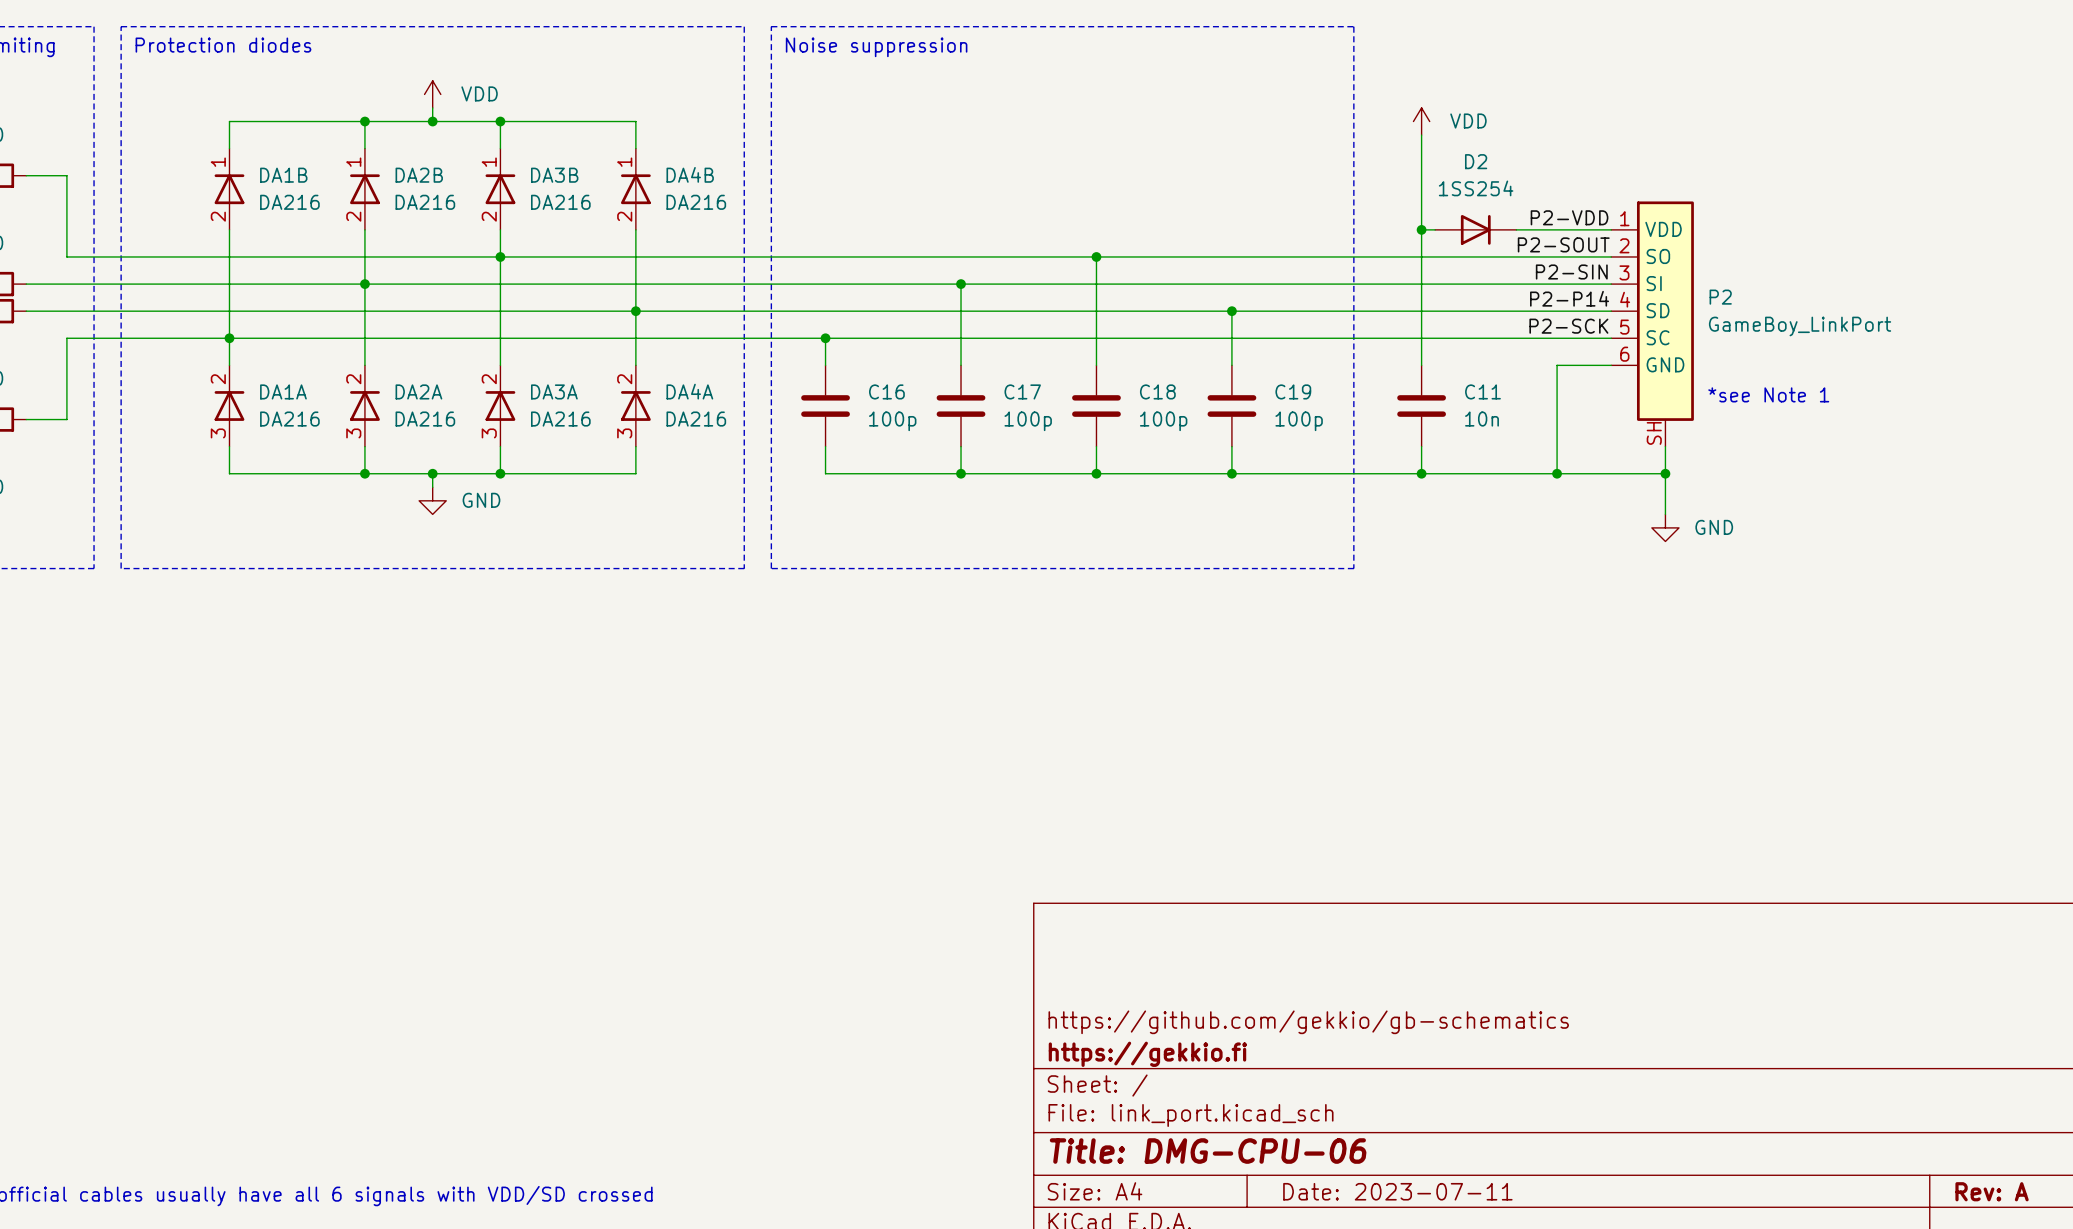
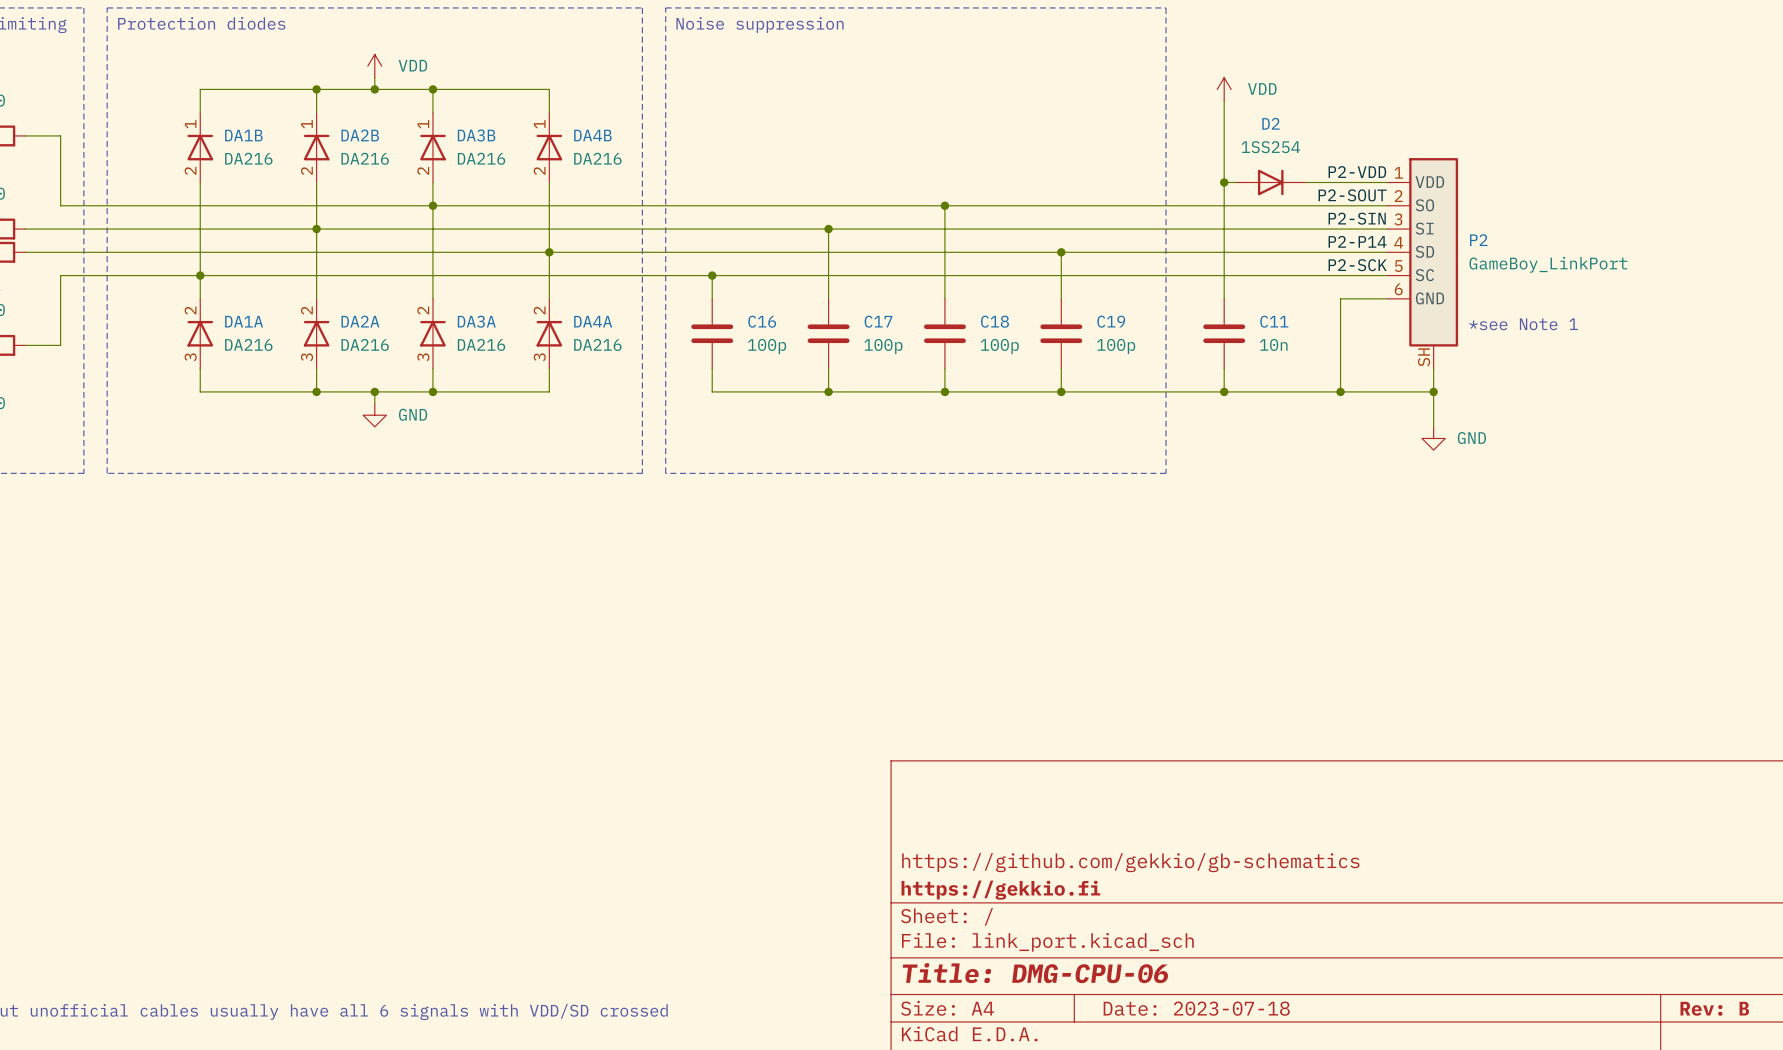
title block: Date: 2023-07-11 (1397, 1191) -> Date: 2023-07-18 (1196, 1008)
title block: Rev: A (1992, 1191) -> Rev: B (1714, 1008)

